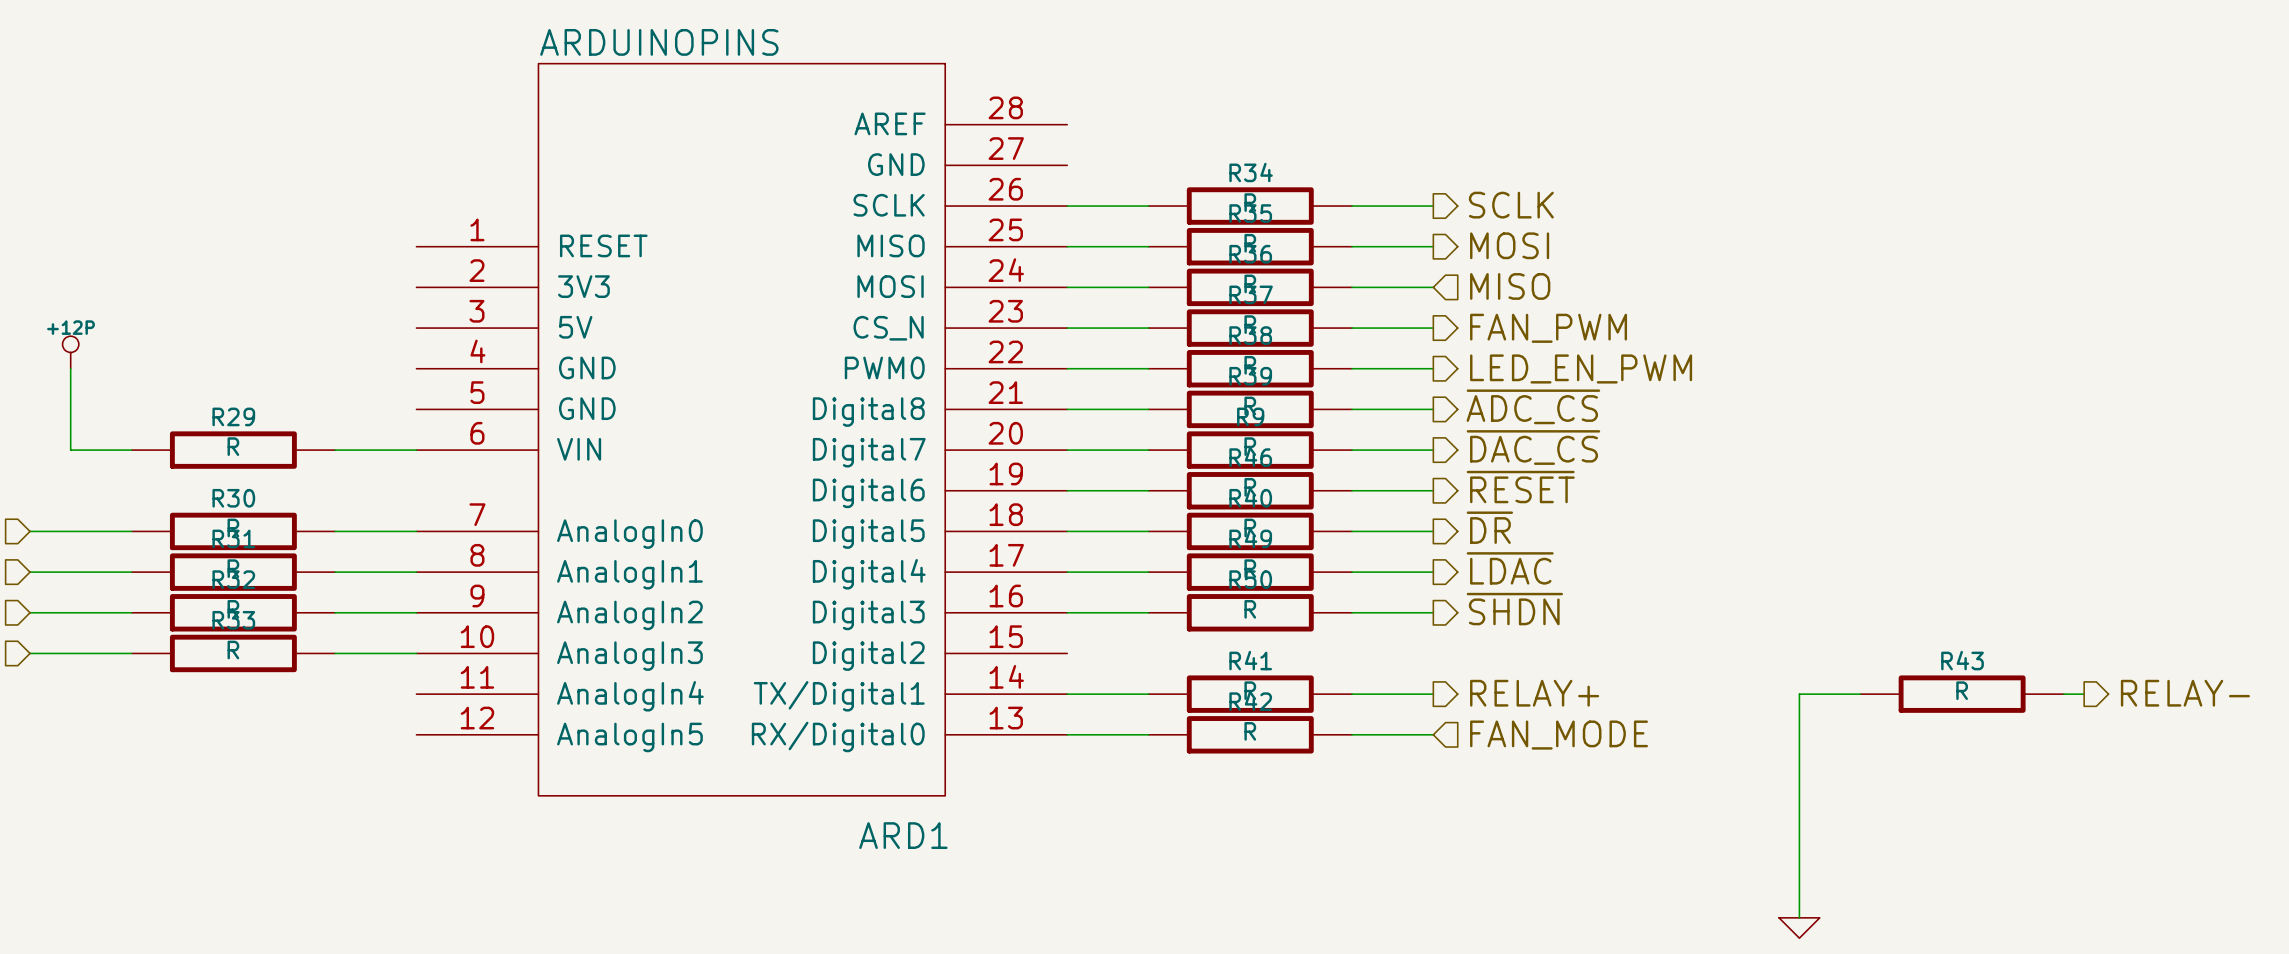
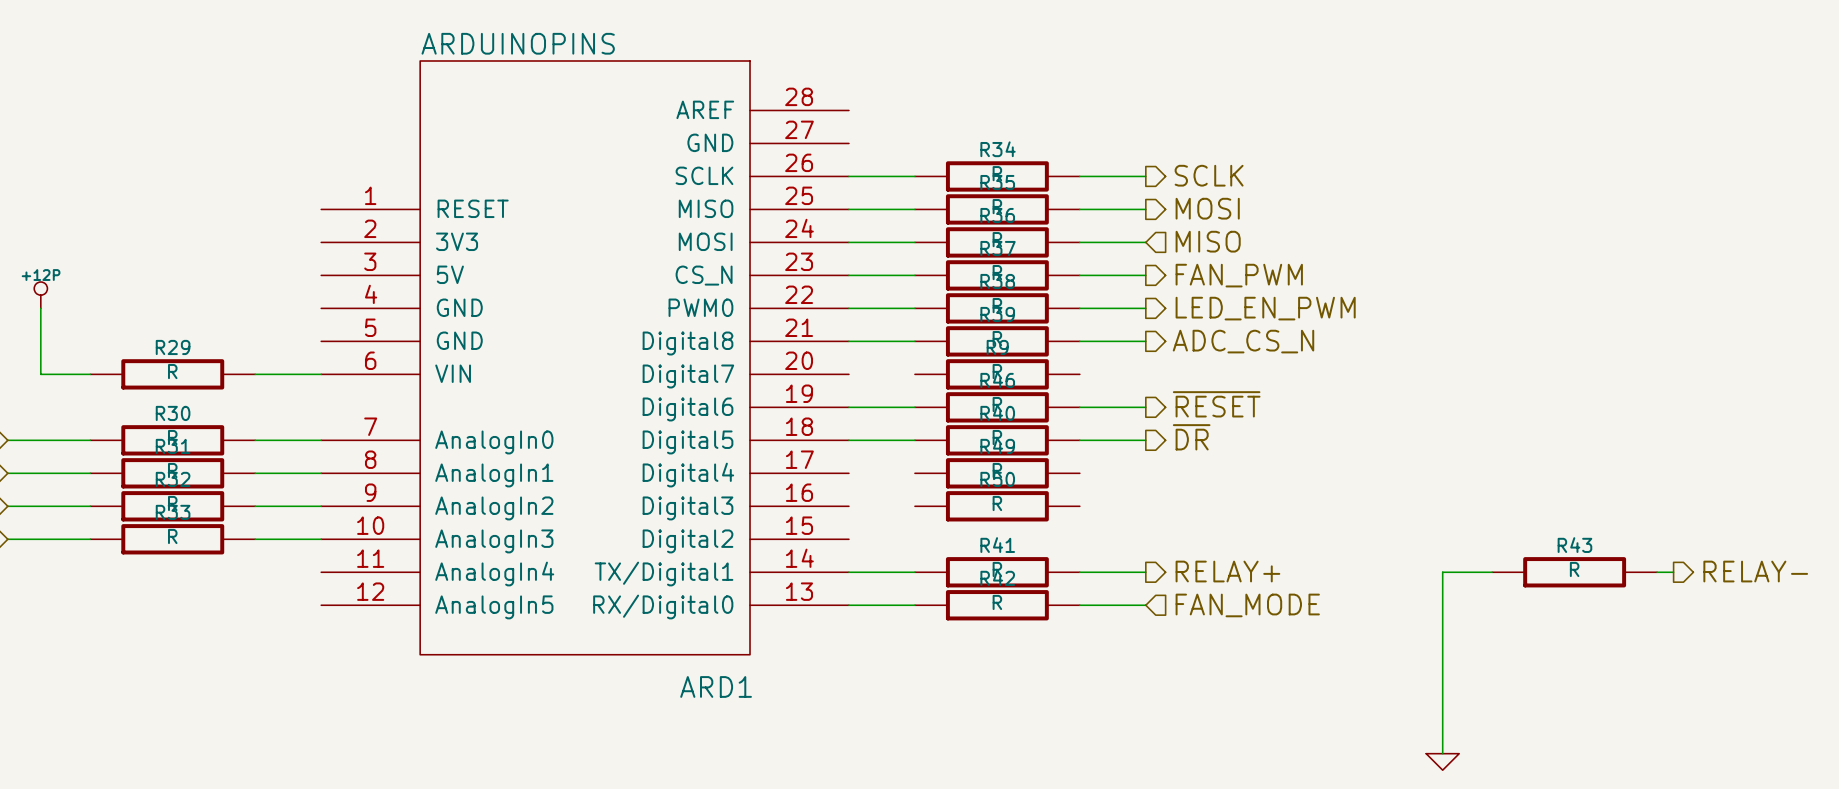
hierarchical label: ~{ADC_CS} (1533, 406) -> ADC_CS_N (1243, 341)
hierarchical label: ~{DAC_CS} (1533, 447) -> none
wire: (1067, 450) (1148, 450) -> none
wire: (1351, 450) (1433, 450) -> none
hierarchical label: ~{LDAC} (1510, 568) -> none
wire: (1067, 572) (1148, 572) -> none
wire: (1351, 572) (1433, 572) -> none
hierarchical label: ~{SHDN} (1514, 609) -> none
wire: (1067, 612) (1148, 612) -> none
wire: (1351, 612) (1433, 612) -> none

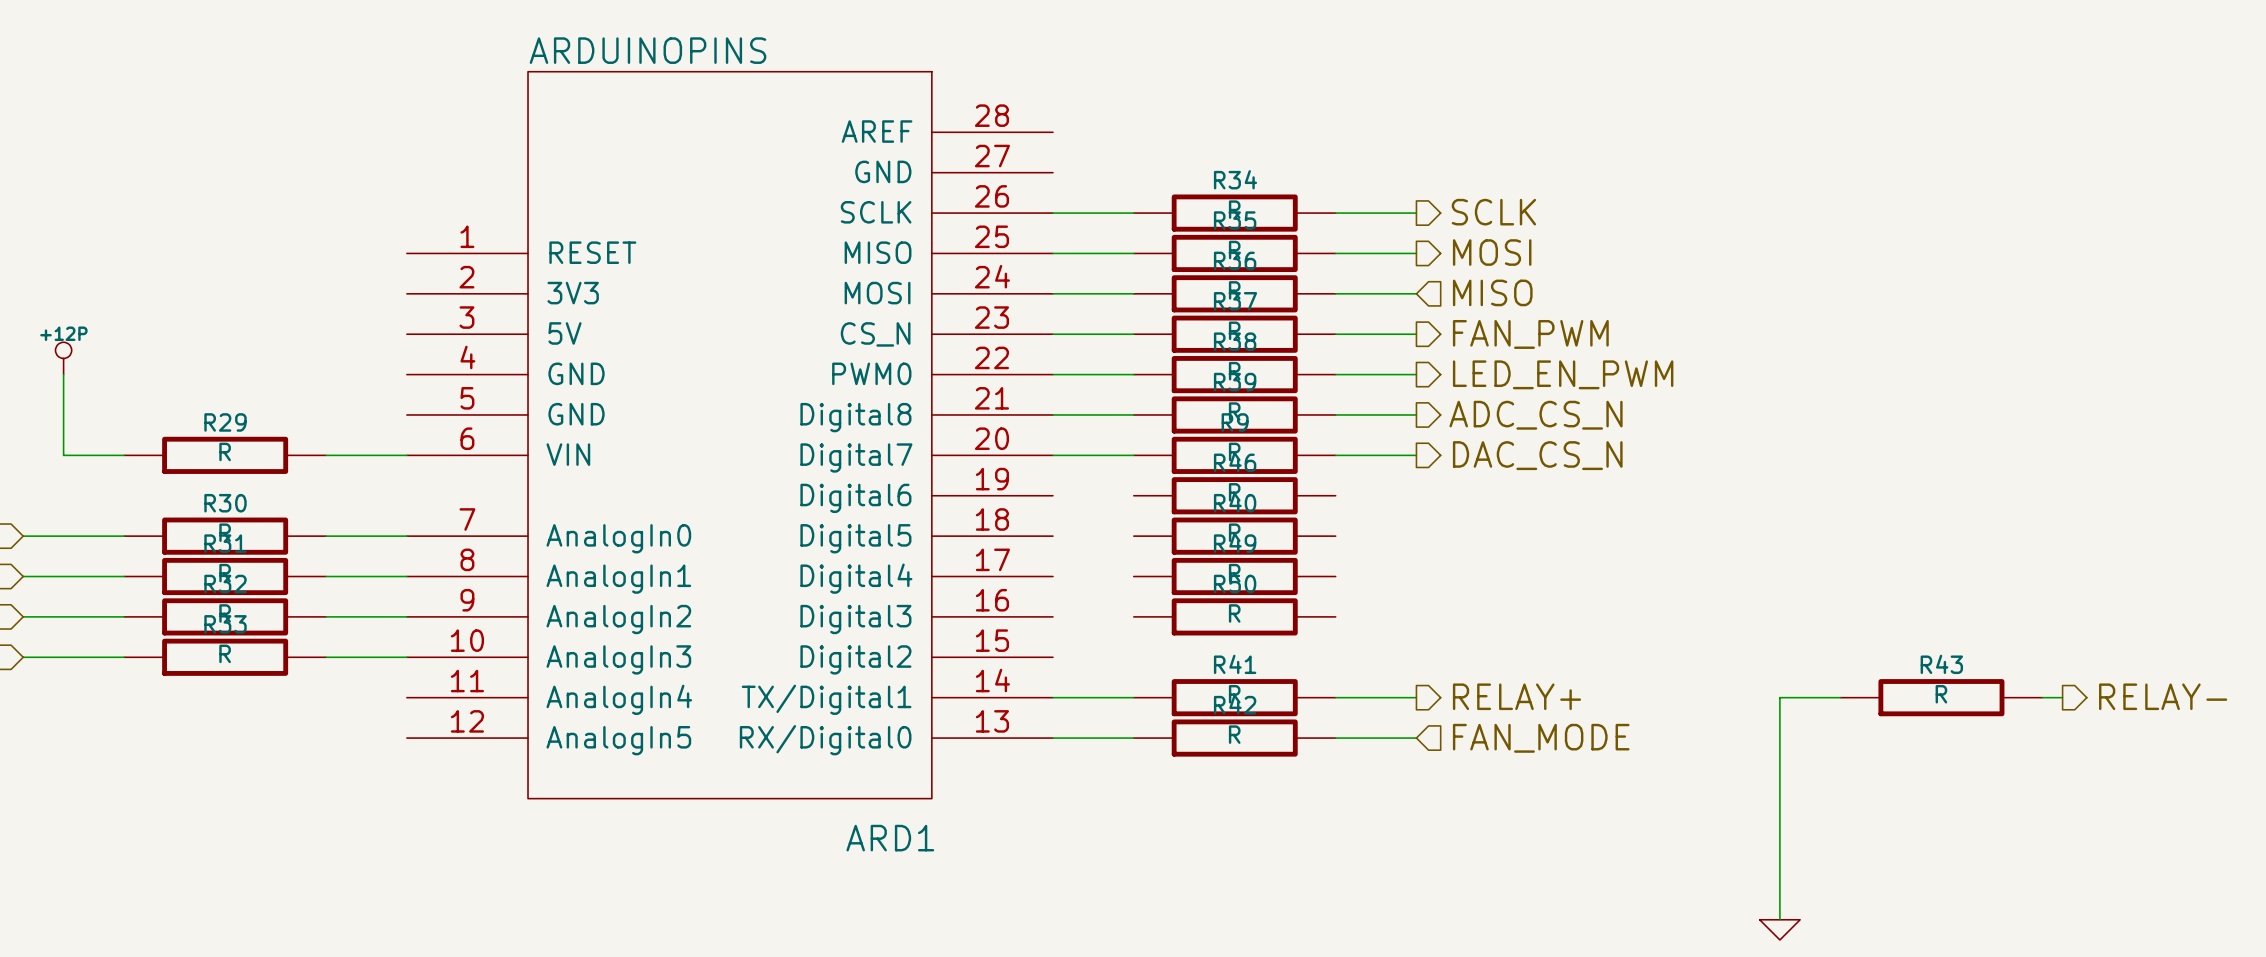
hierarchical label: none -> DAC_CS_N (1537, 455)
hierarchical label: ~{RESET} (1216, 404) -> none
wire: (848, 407) (914, 407) -> (1053, 455) (1133, 455)
wire: (1079, 407) (1145, 407) -> (1335, 455) (1416, 455)
hierarchical label: ~{DR} (1191, 437) -> none
wire: (848, 440) (914, 440) -> none
wire: (1079, 440) (1145, 440) -> none

